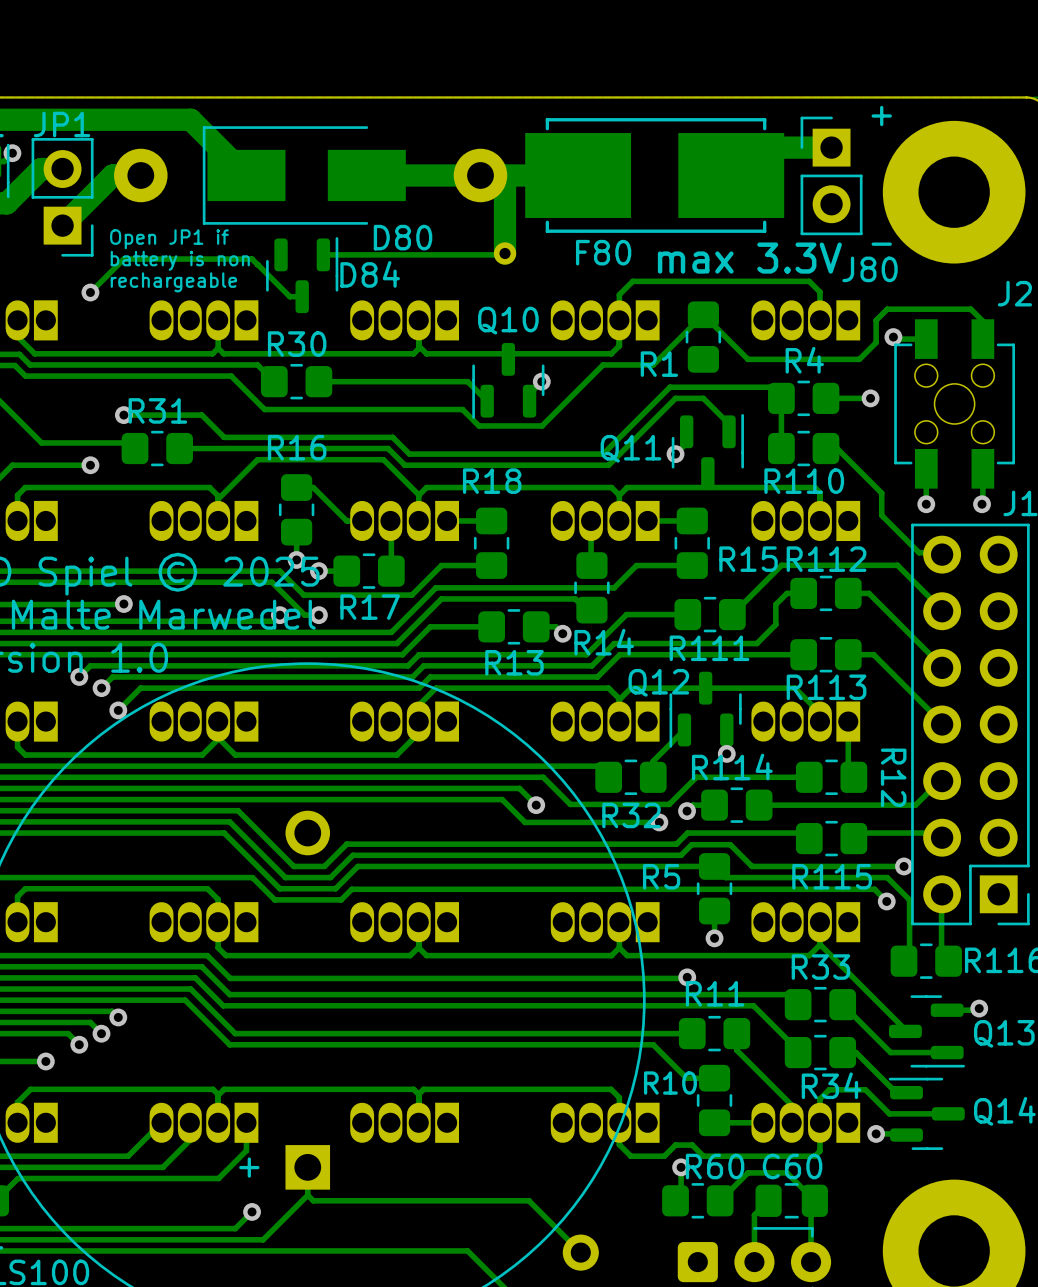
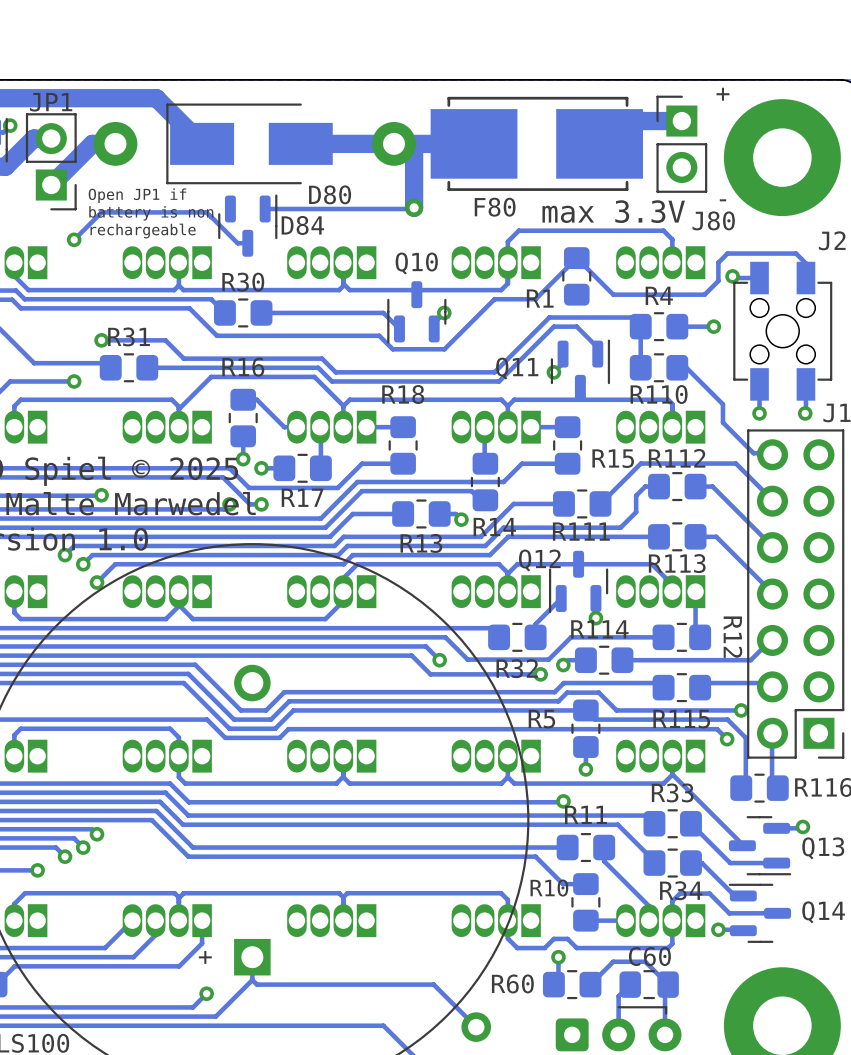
R60 name position: R60 (715, 1166) -> R60 (512, 983)

